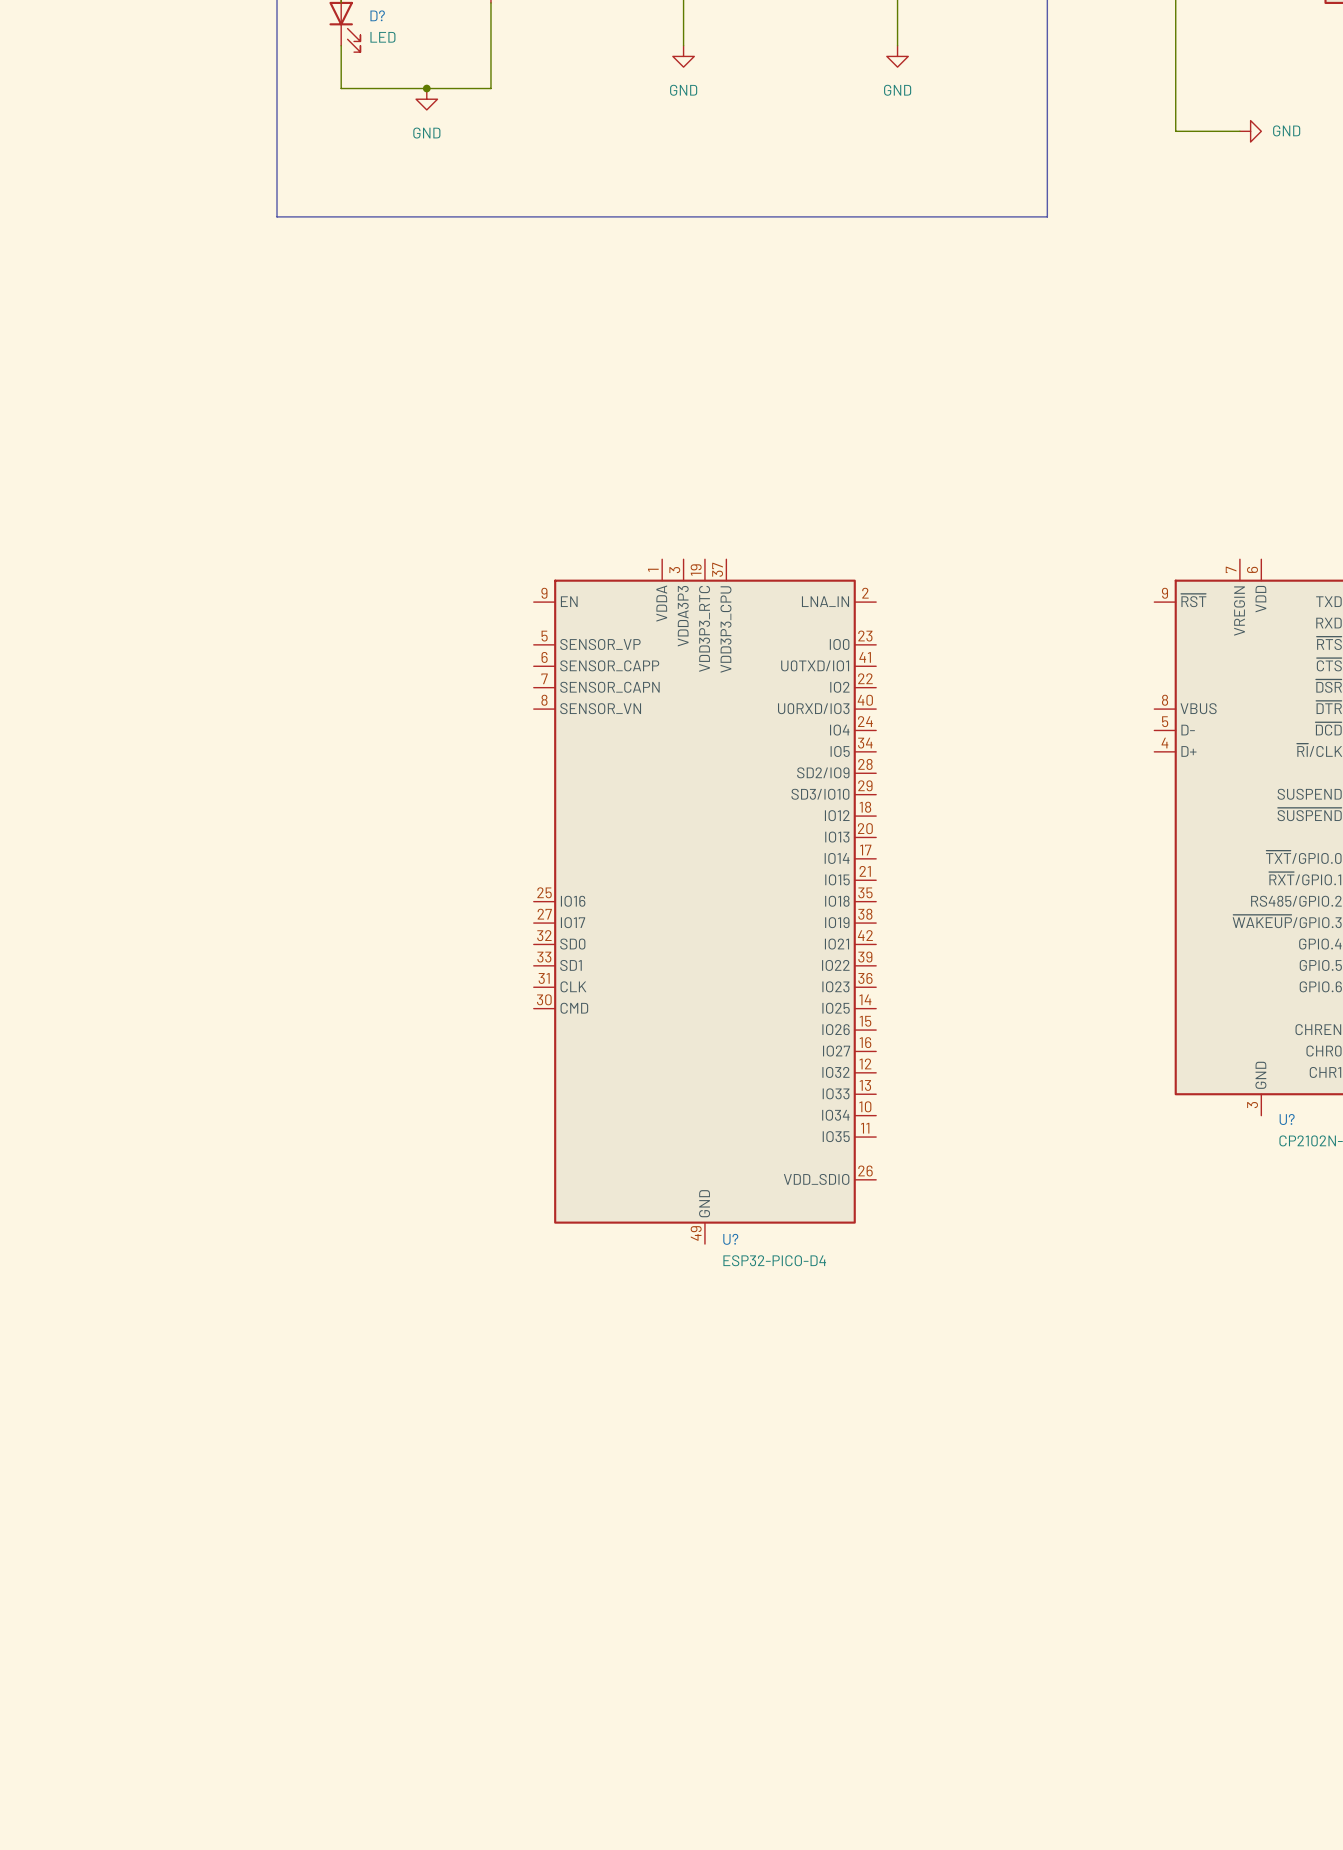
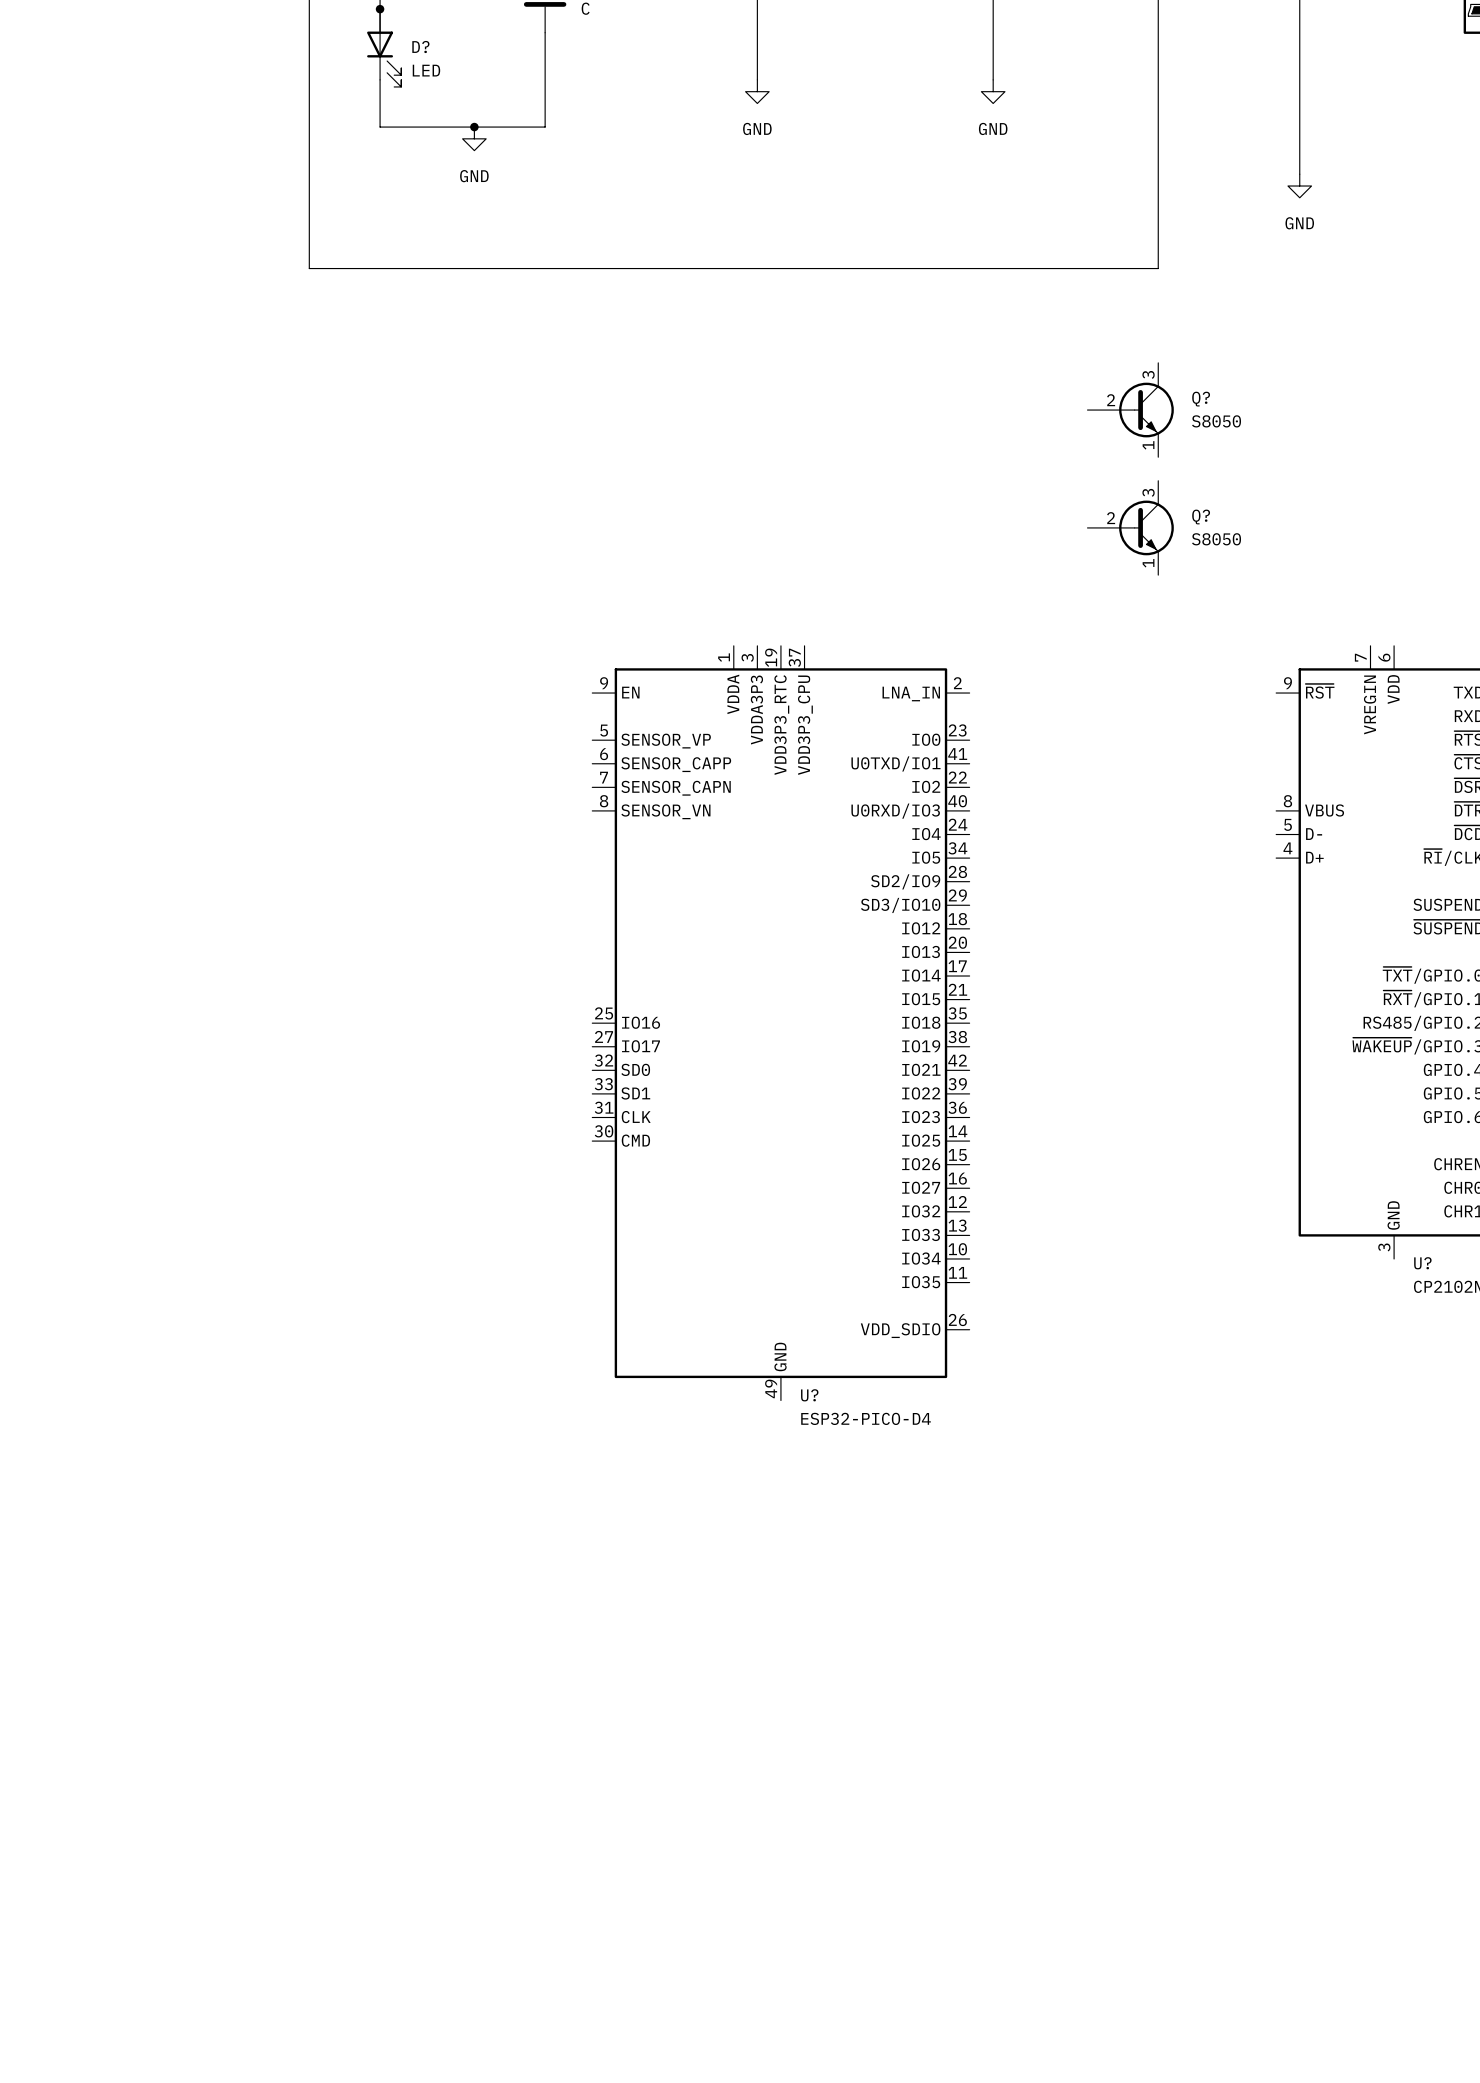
wire: (1175, 131) (1239, 131) -> none
power symbol rotation: 0° (1250, 131) -> 90° clockwise (1299, 186)
power symbol position: GND (1250, 131) -> GND (1299, 186)
Q?: none -> S8050 (1130, 410)
Q?: none -> S8050 (1130, 527)

